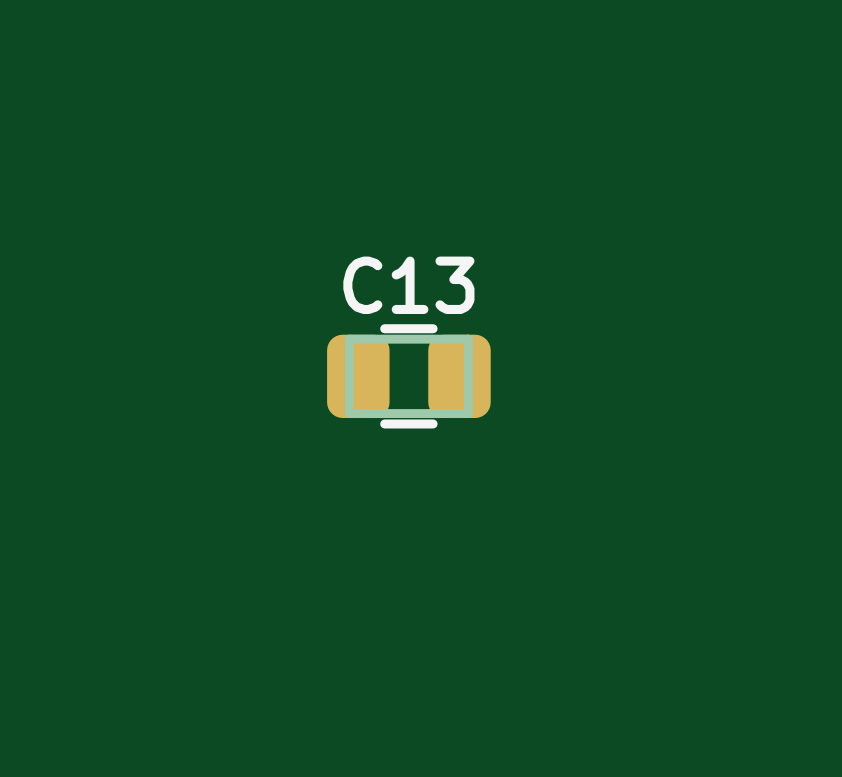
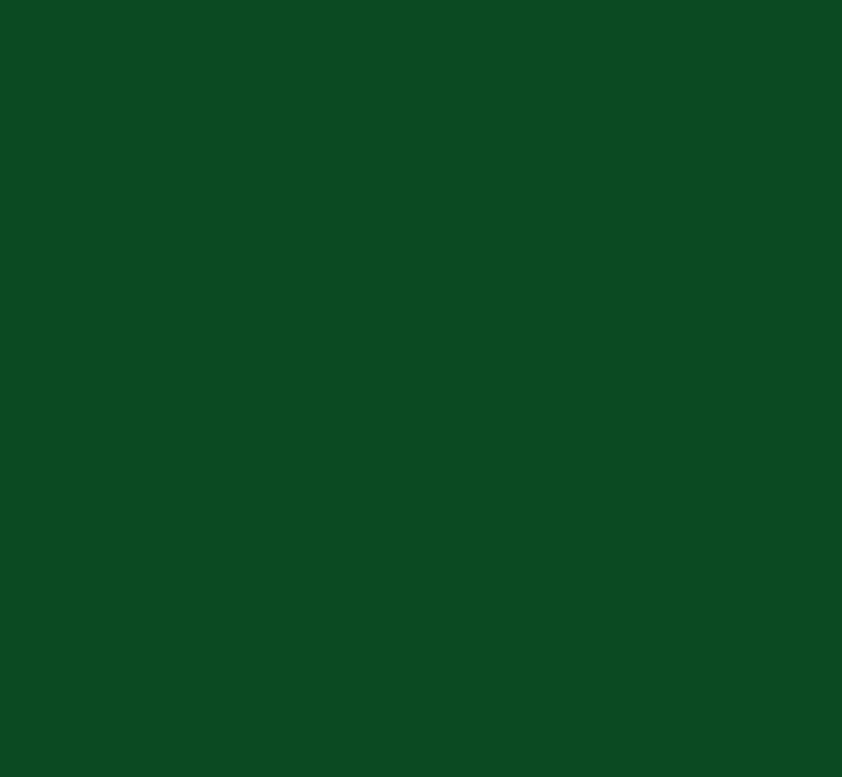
C13: (408, 376) -> none

